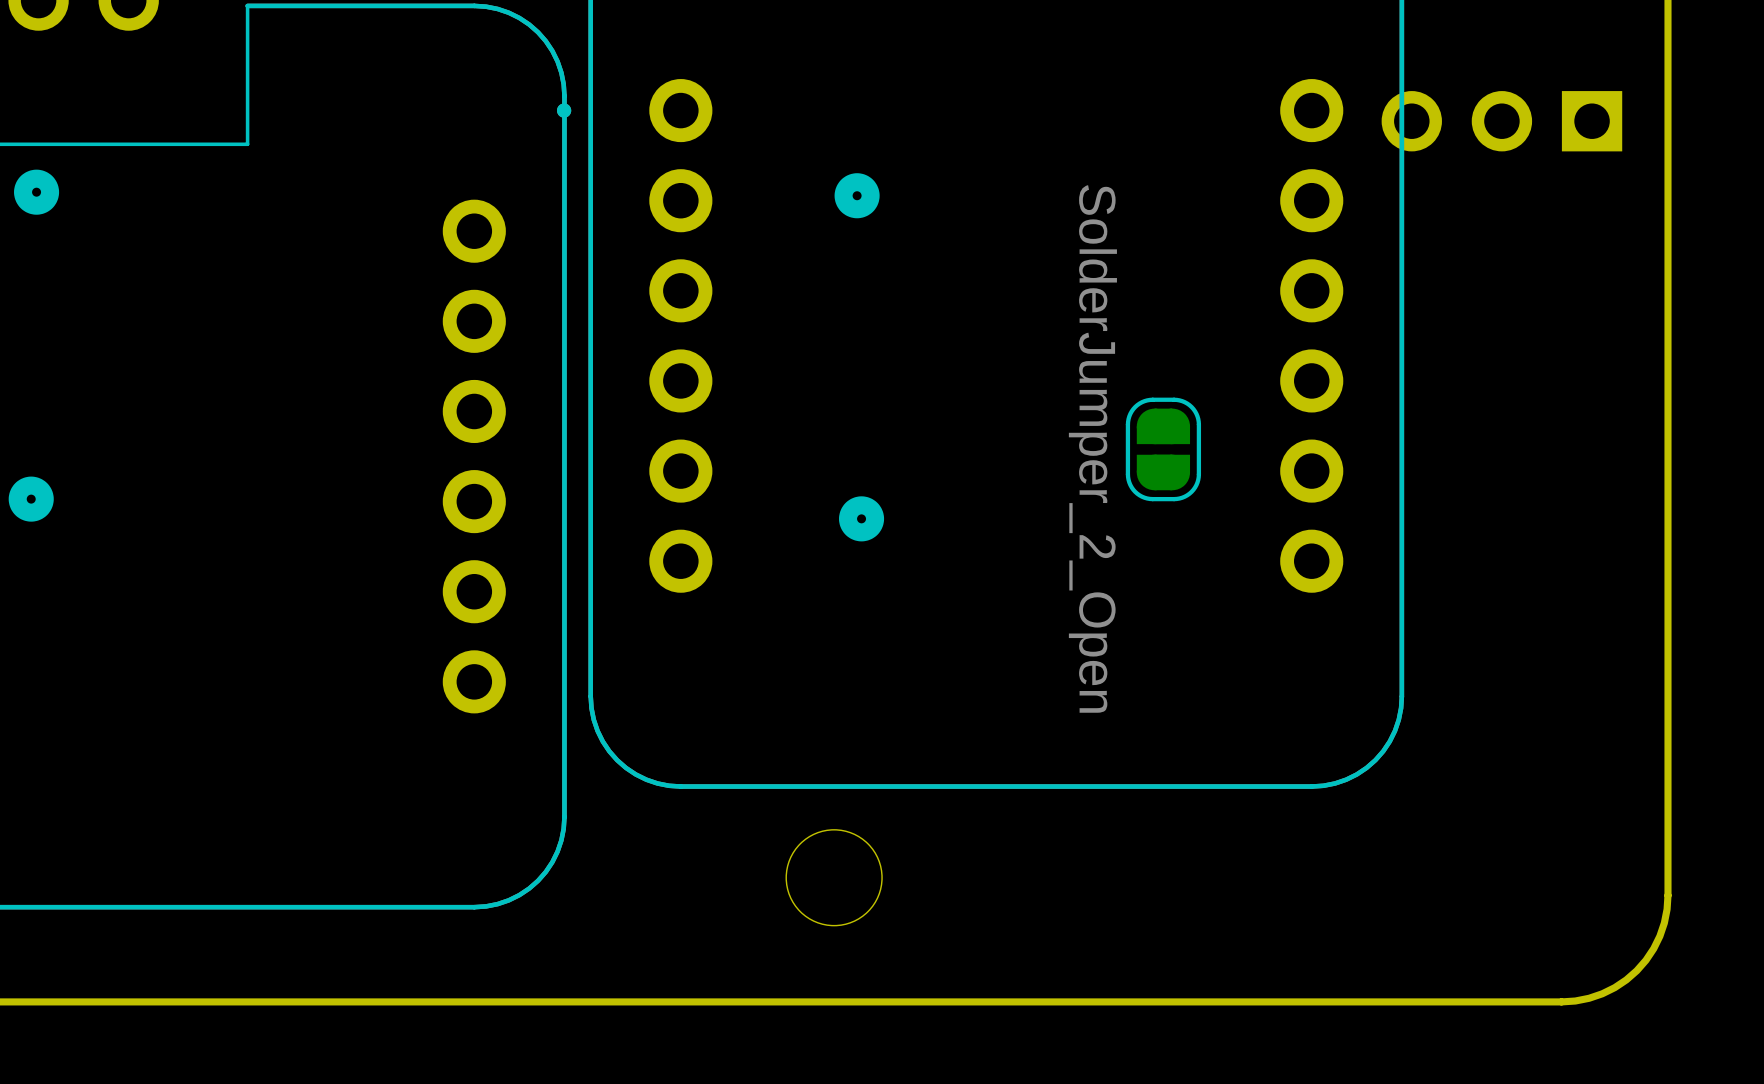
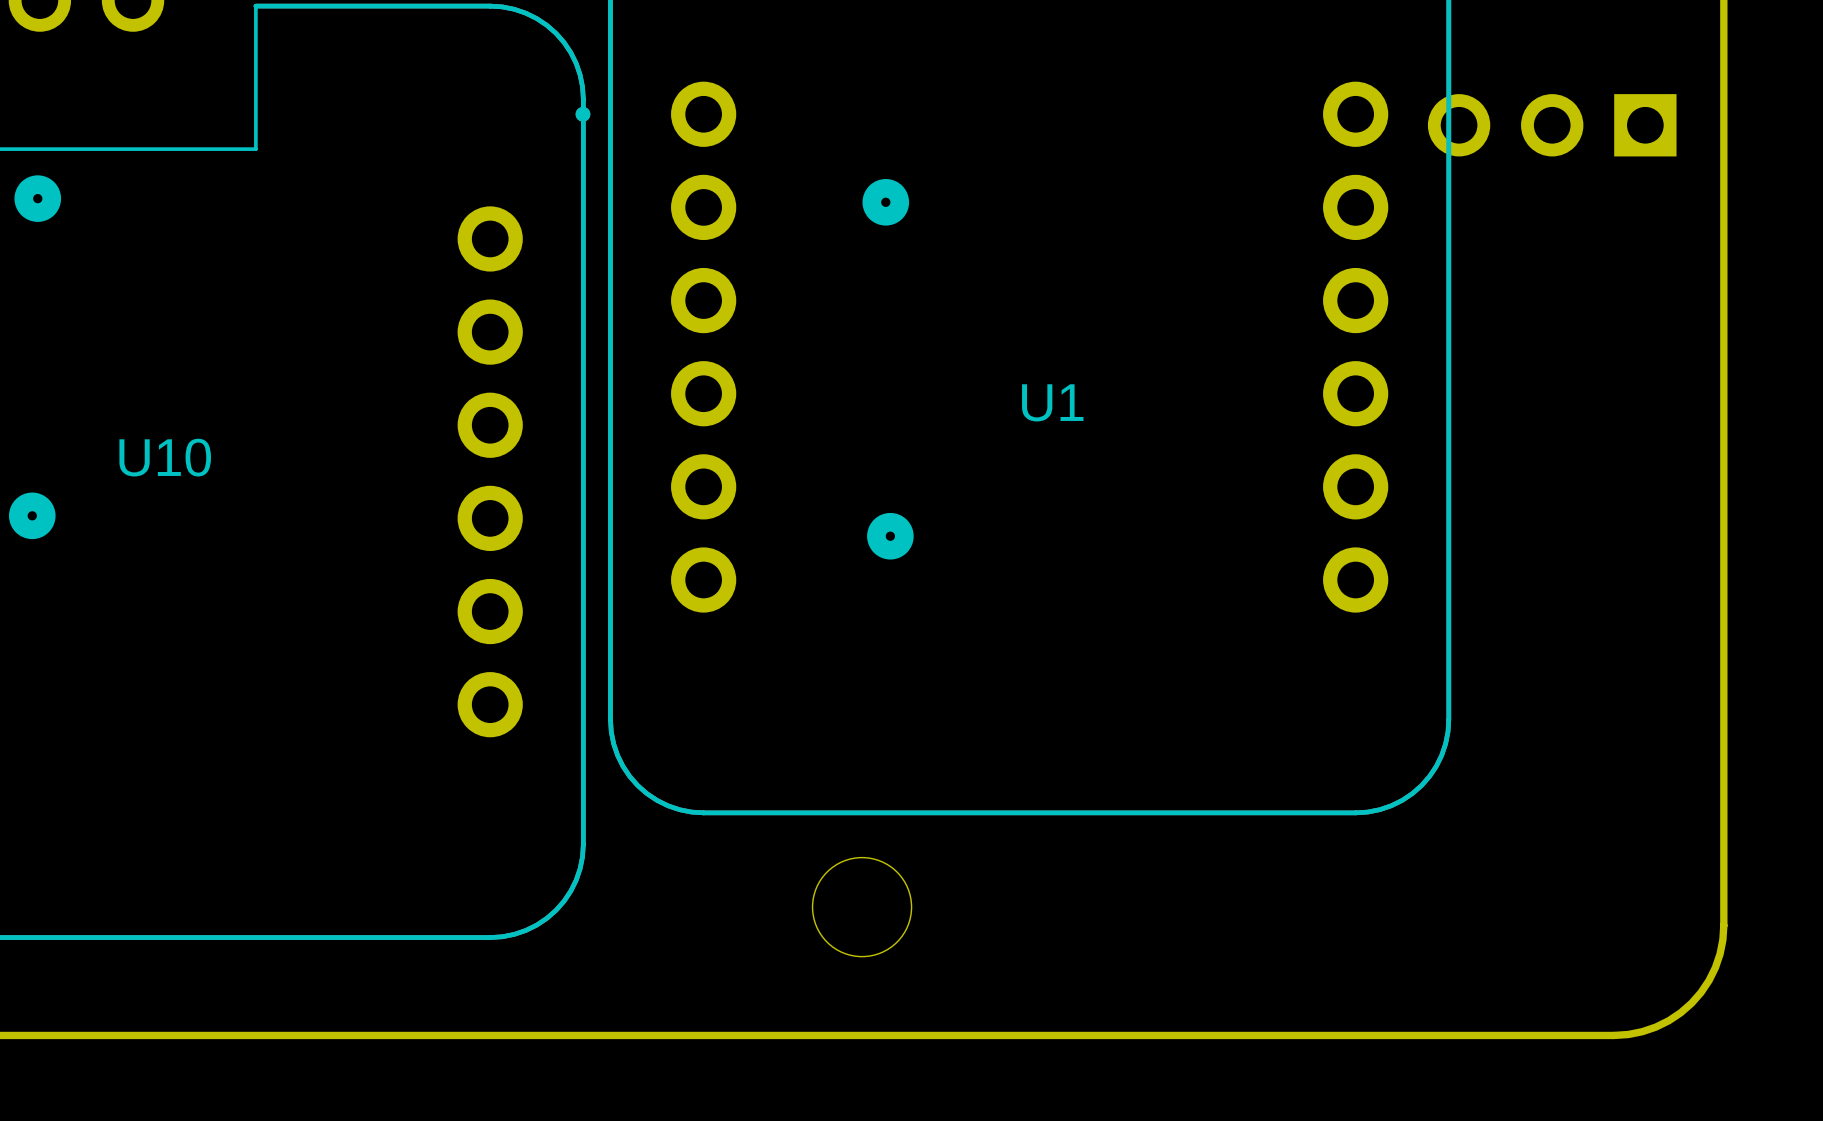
U1 name: none -> U1 (1052, 402)
U10 name: none -> U10 (165, 457)
part: SolderJumper_2_Open (1163, 449) -> none

